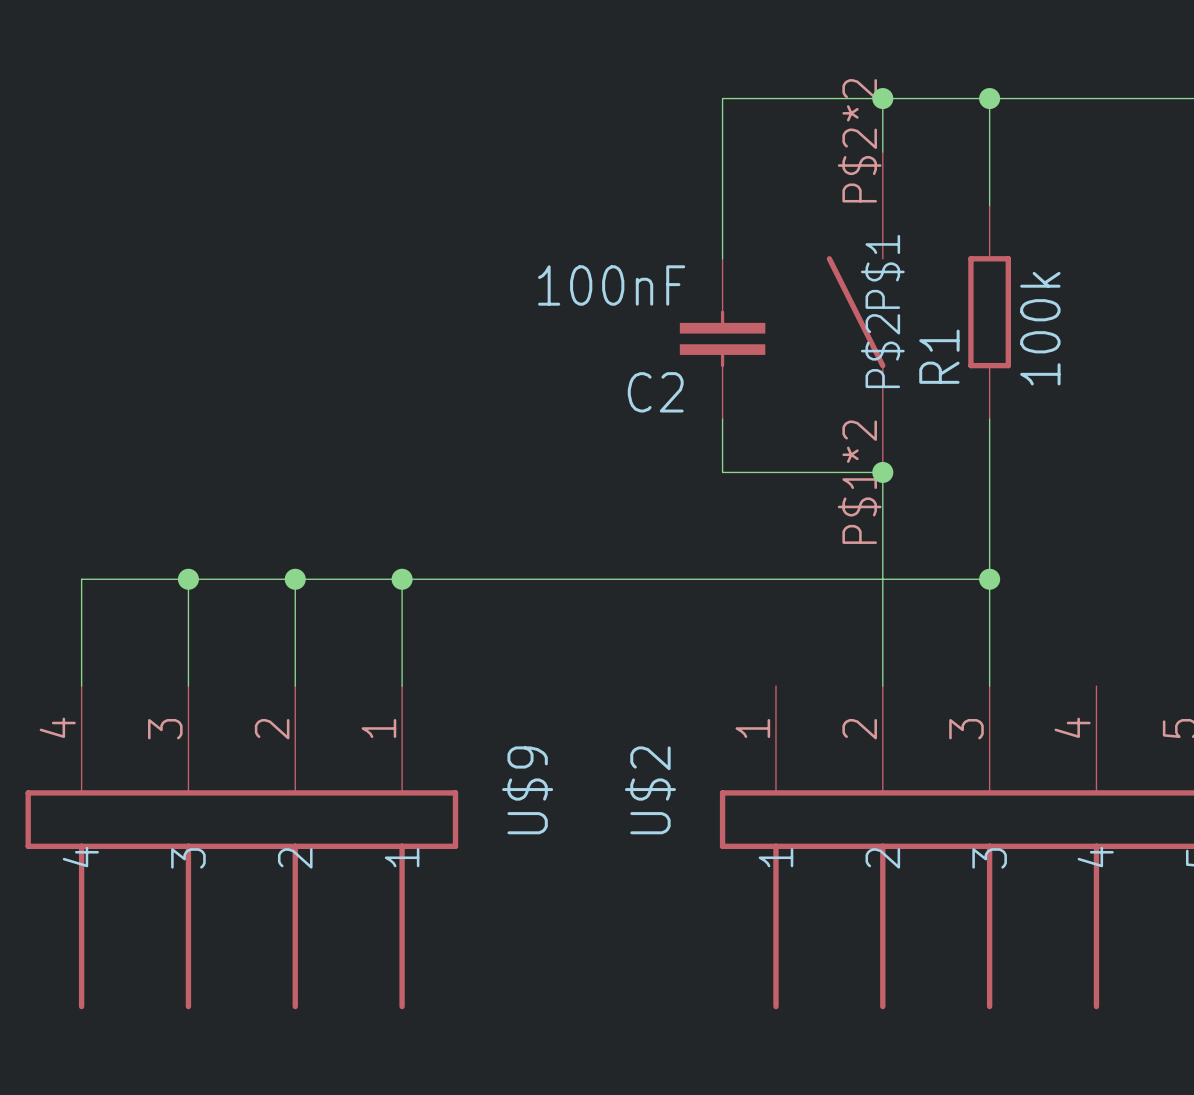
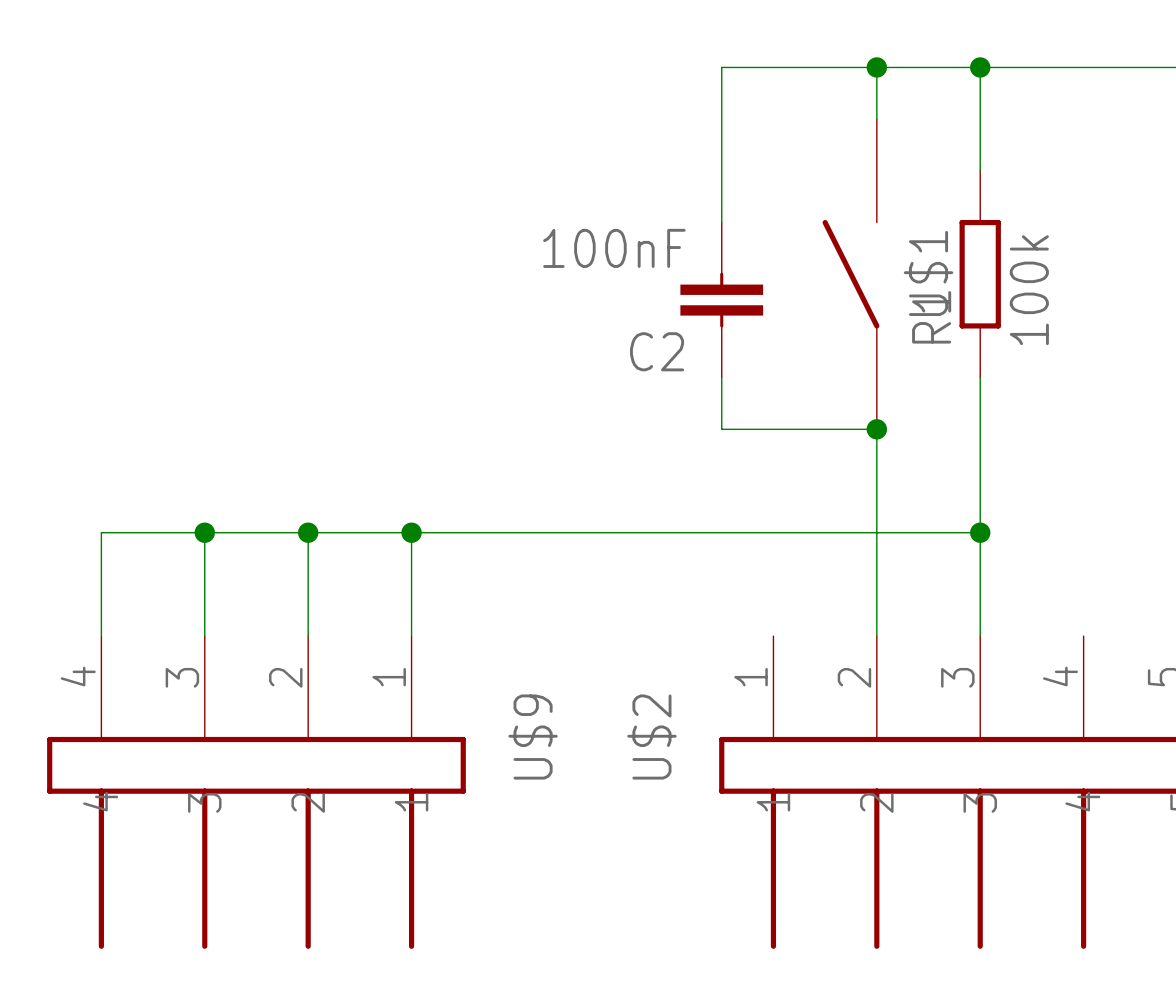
U$1 pin number: P$2*2 (859, 140) -> none
U$1 pin name: P$1 (882, 271) -> none
U$1 name: none -> U$1 (928, 273)
U$1 pin name: P$2 (882, 351) -> none
U$1 pin number: P$1*2 (859, 482) -> none

